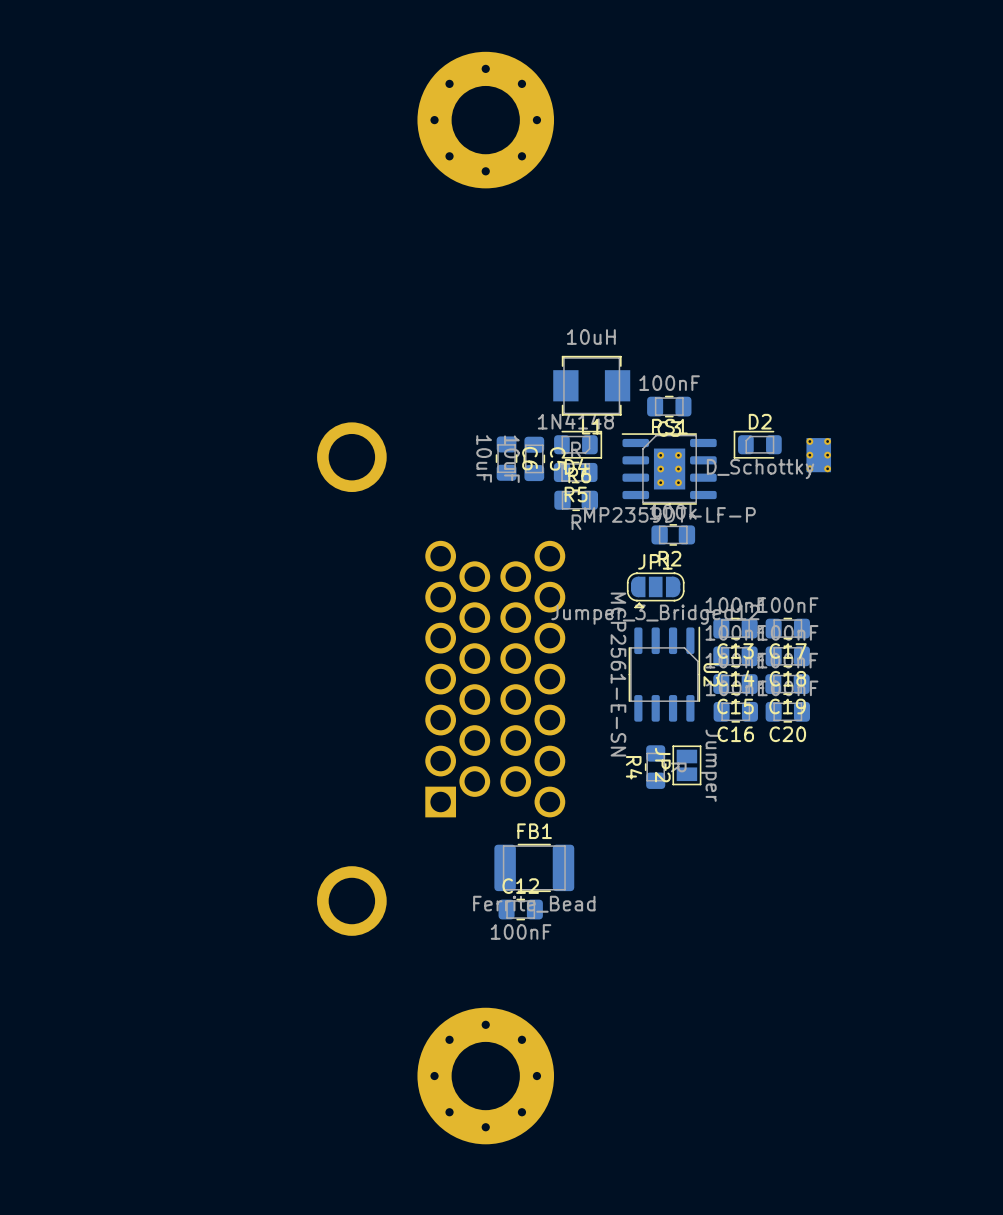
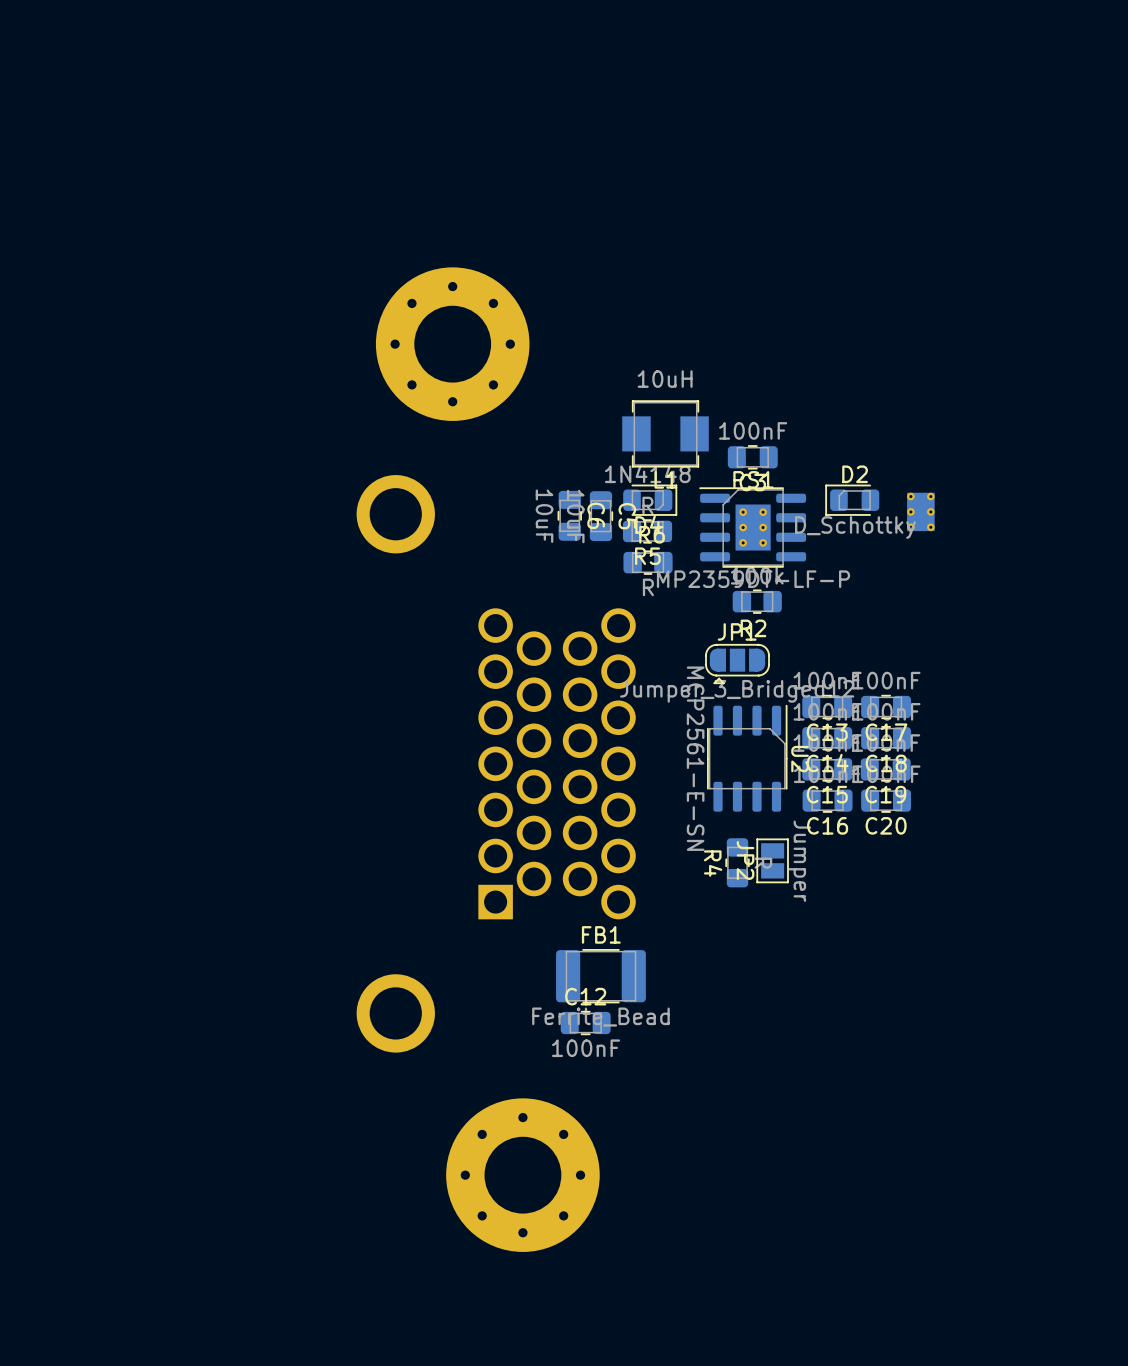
part position: (485, 120) -> (452, 344)
part position: (485, 1076) -> (522, 1175)

